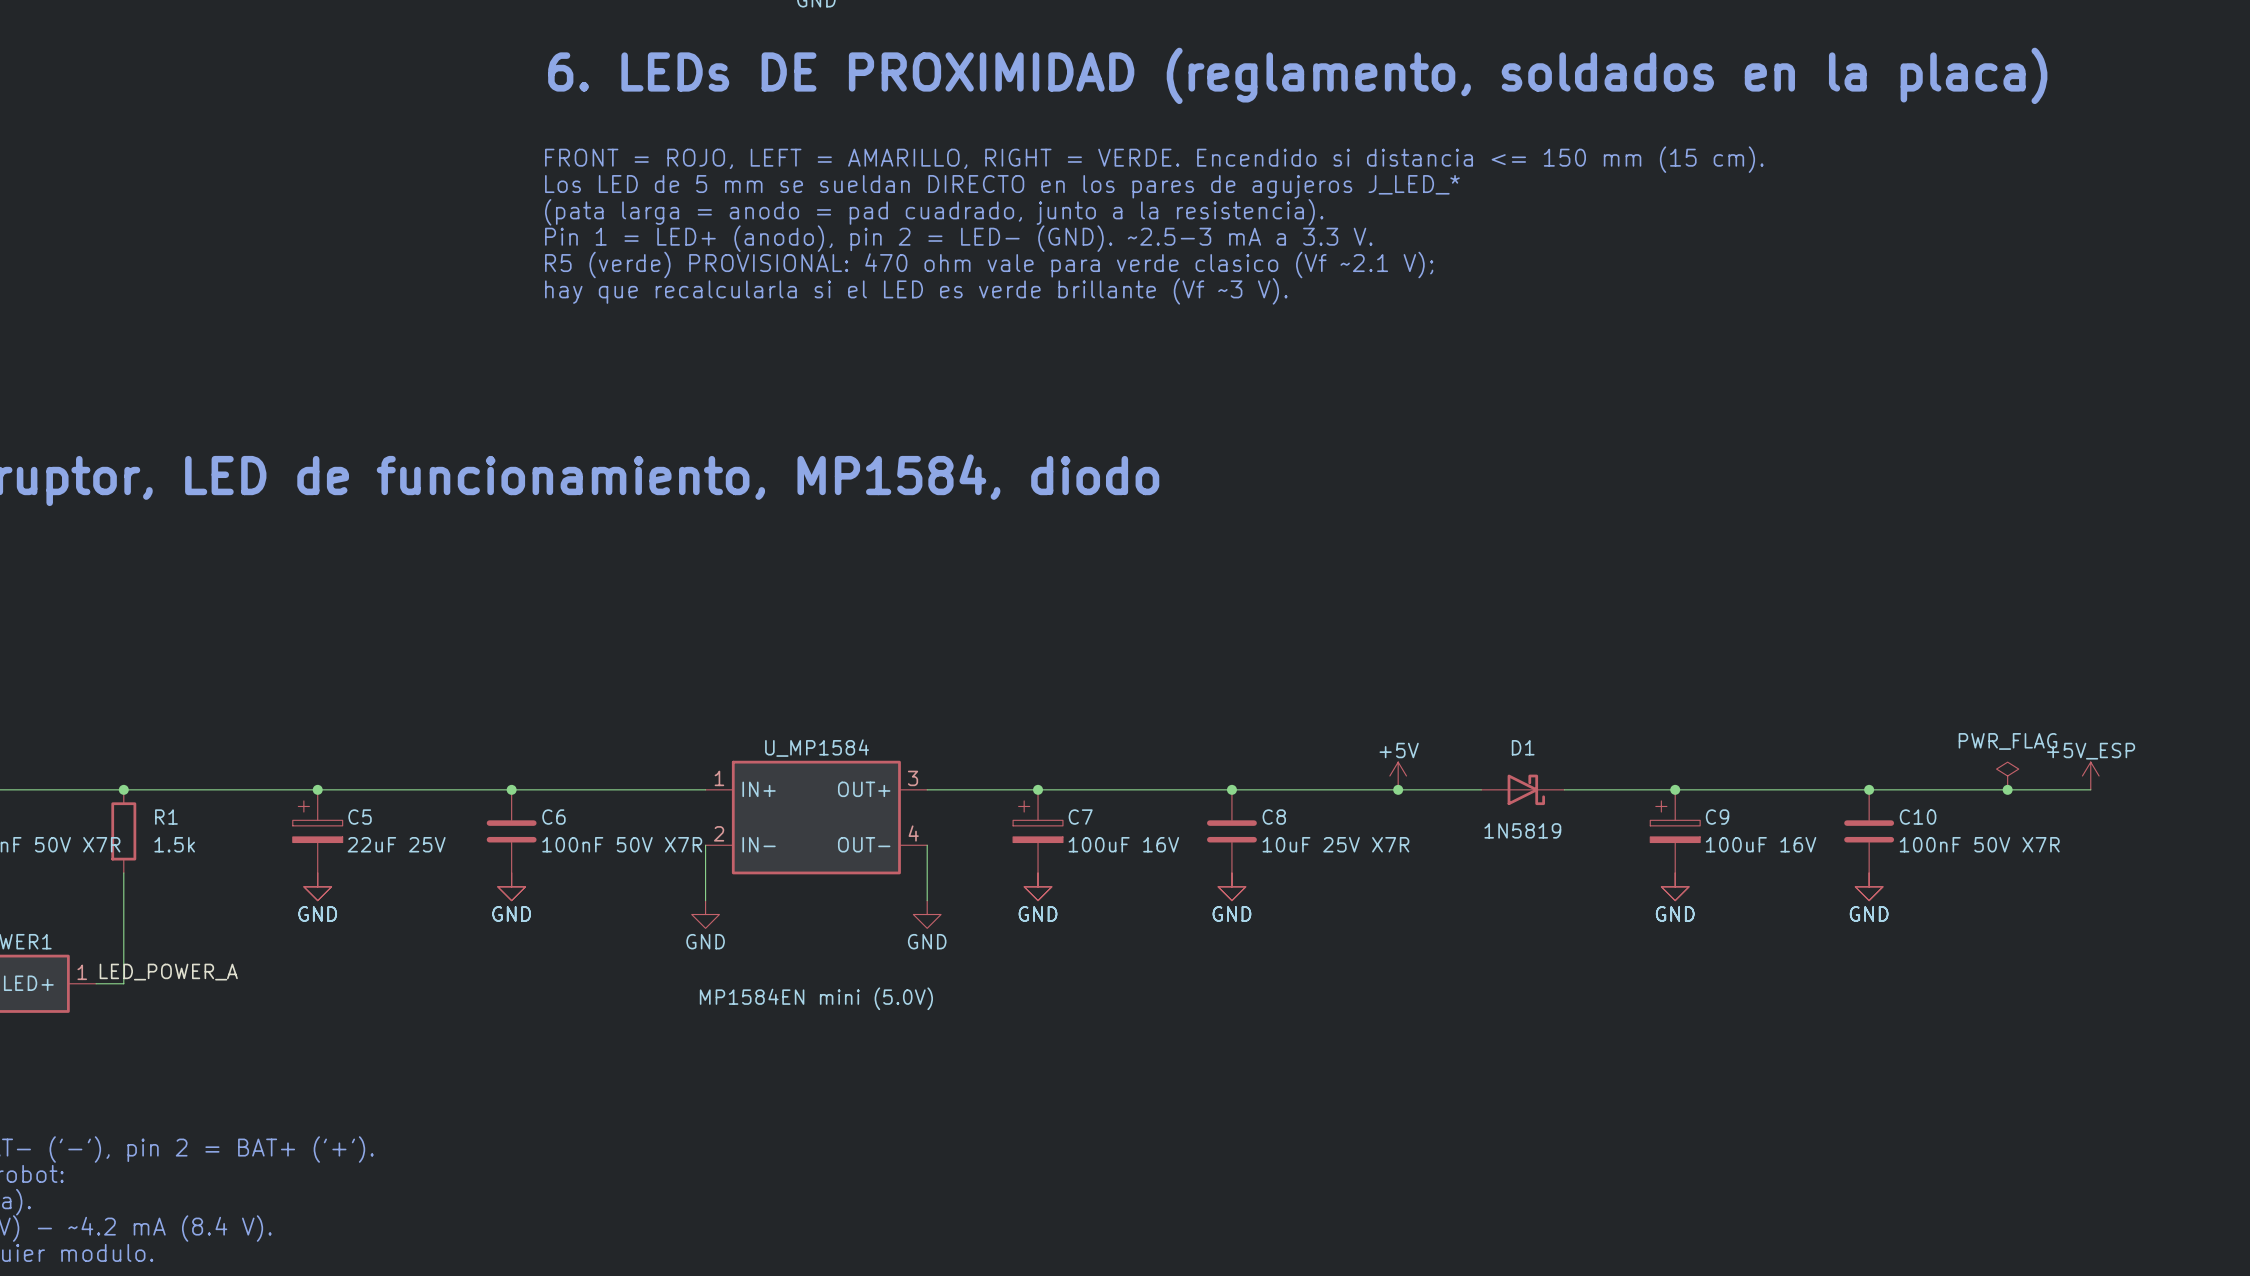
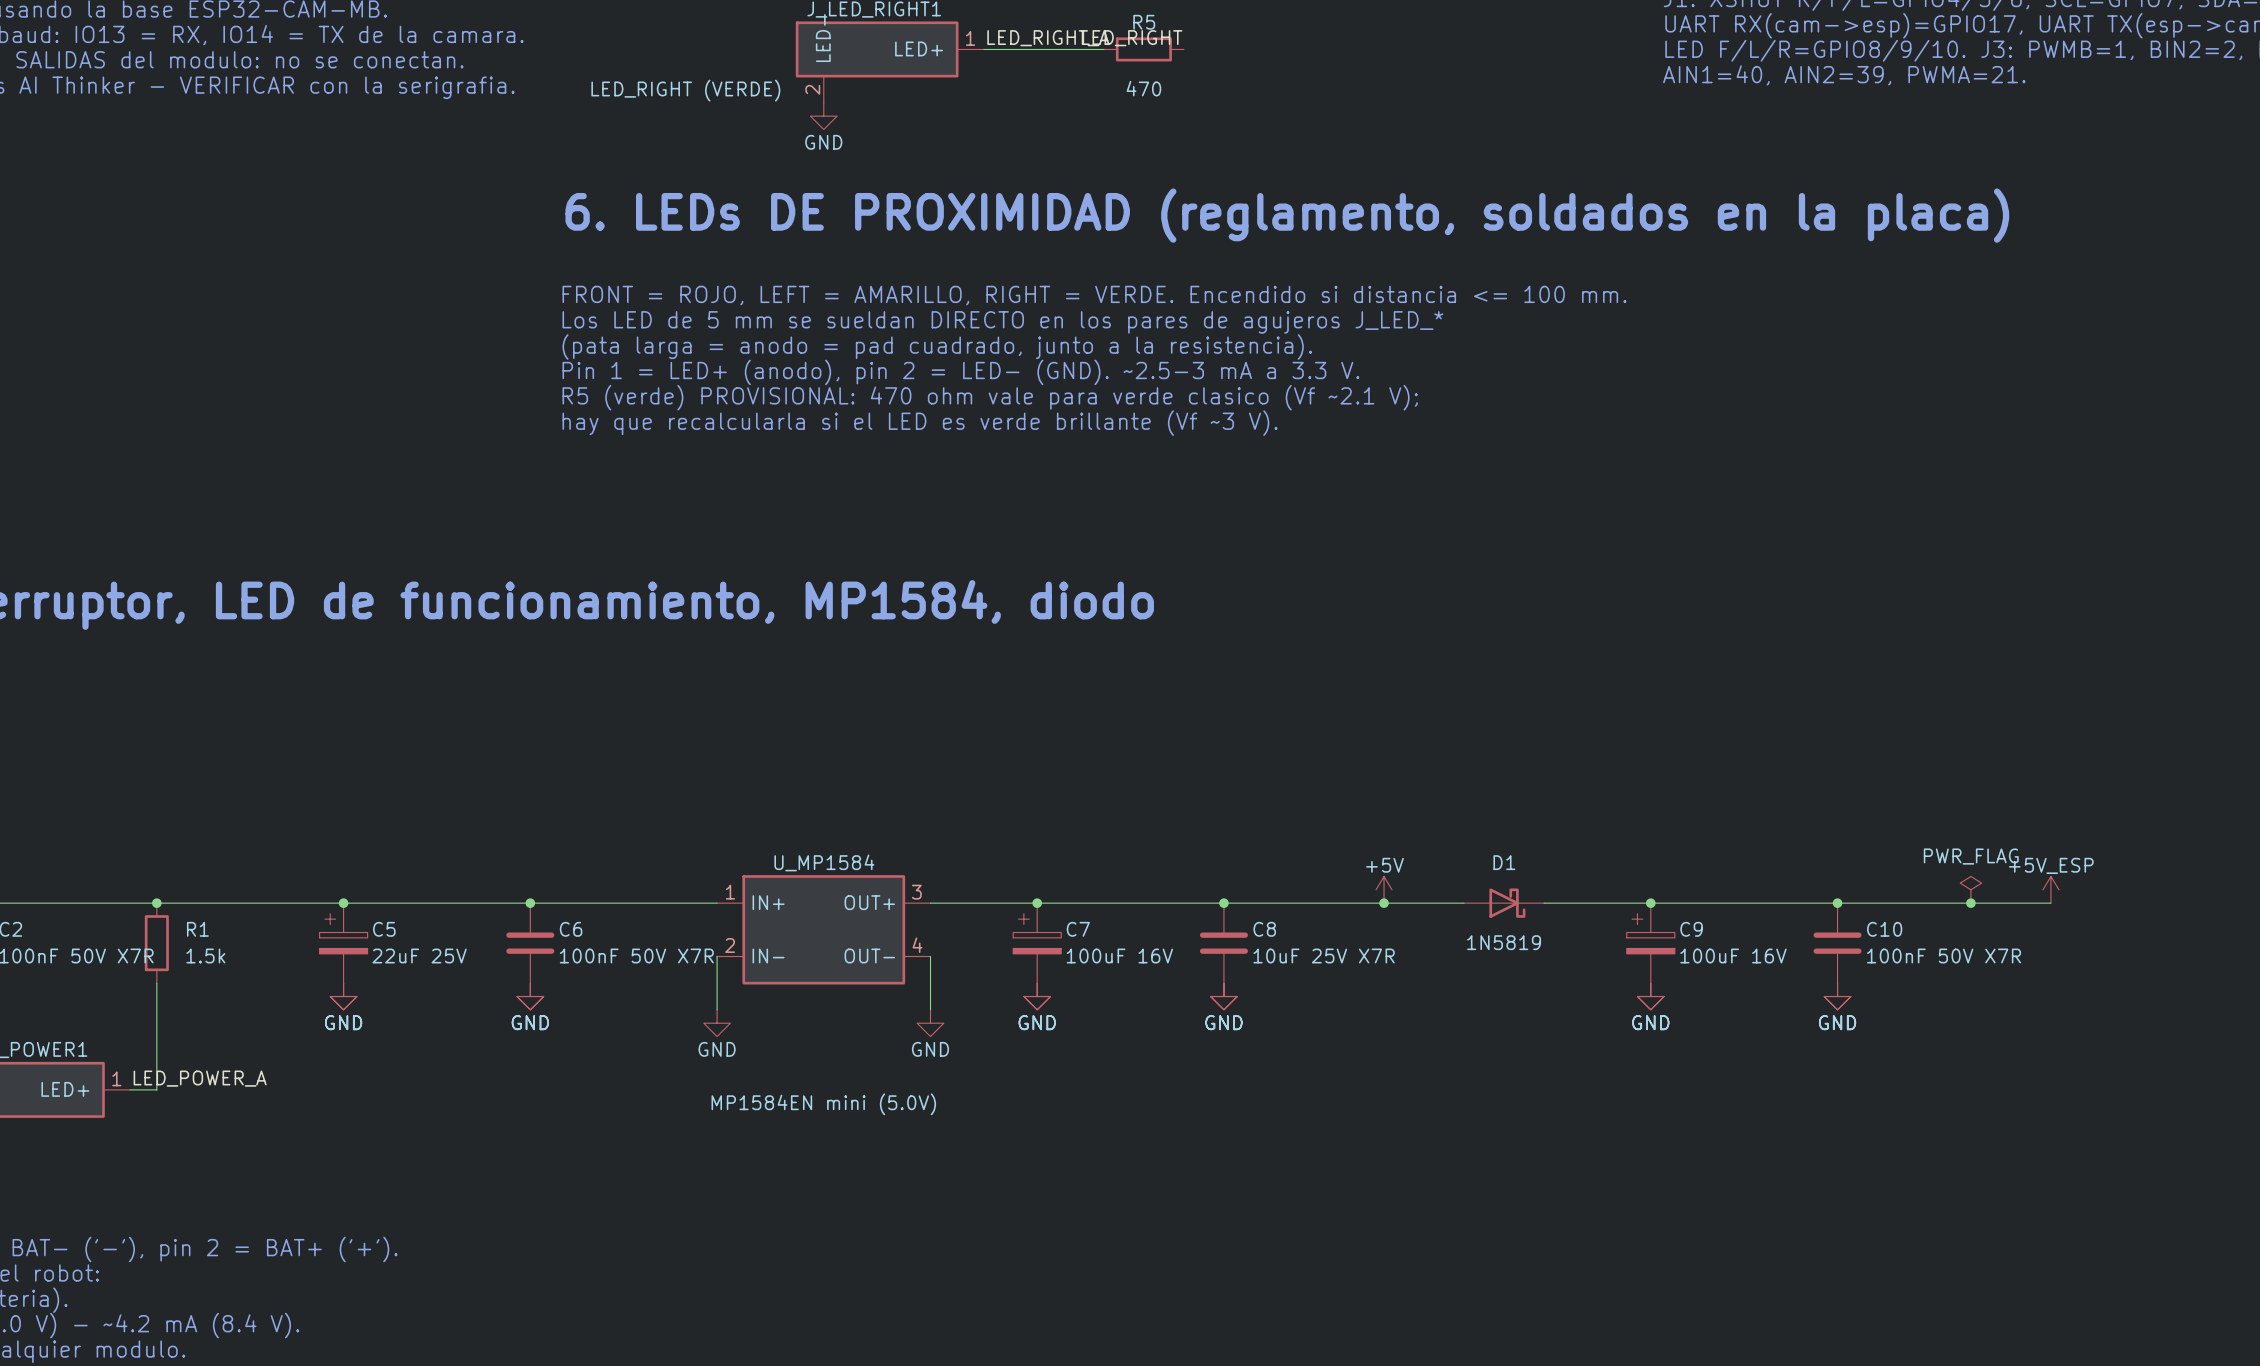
text: FRONT = ROJO, LEFT = AMARILLO, RIGHT = VERDE. Encendido si distancia <= 150 mm (15 cm). (1154, 159) -> FRONT = ROJO, LEFT = AMARILLO, RIGHT = VERDE. Encendido si distancia <= 100 mm. (1094, 295)

